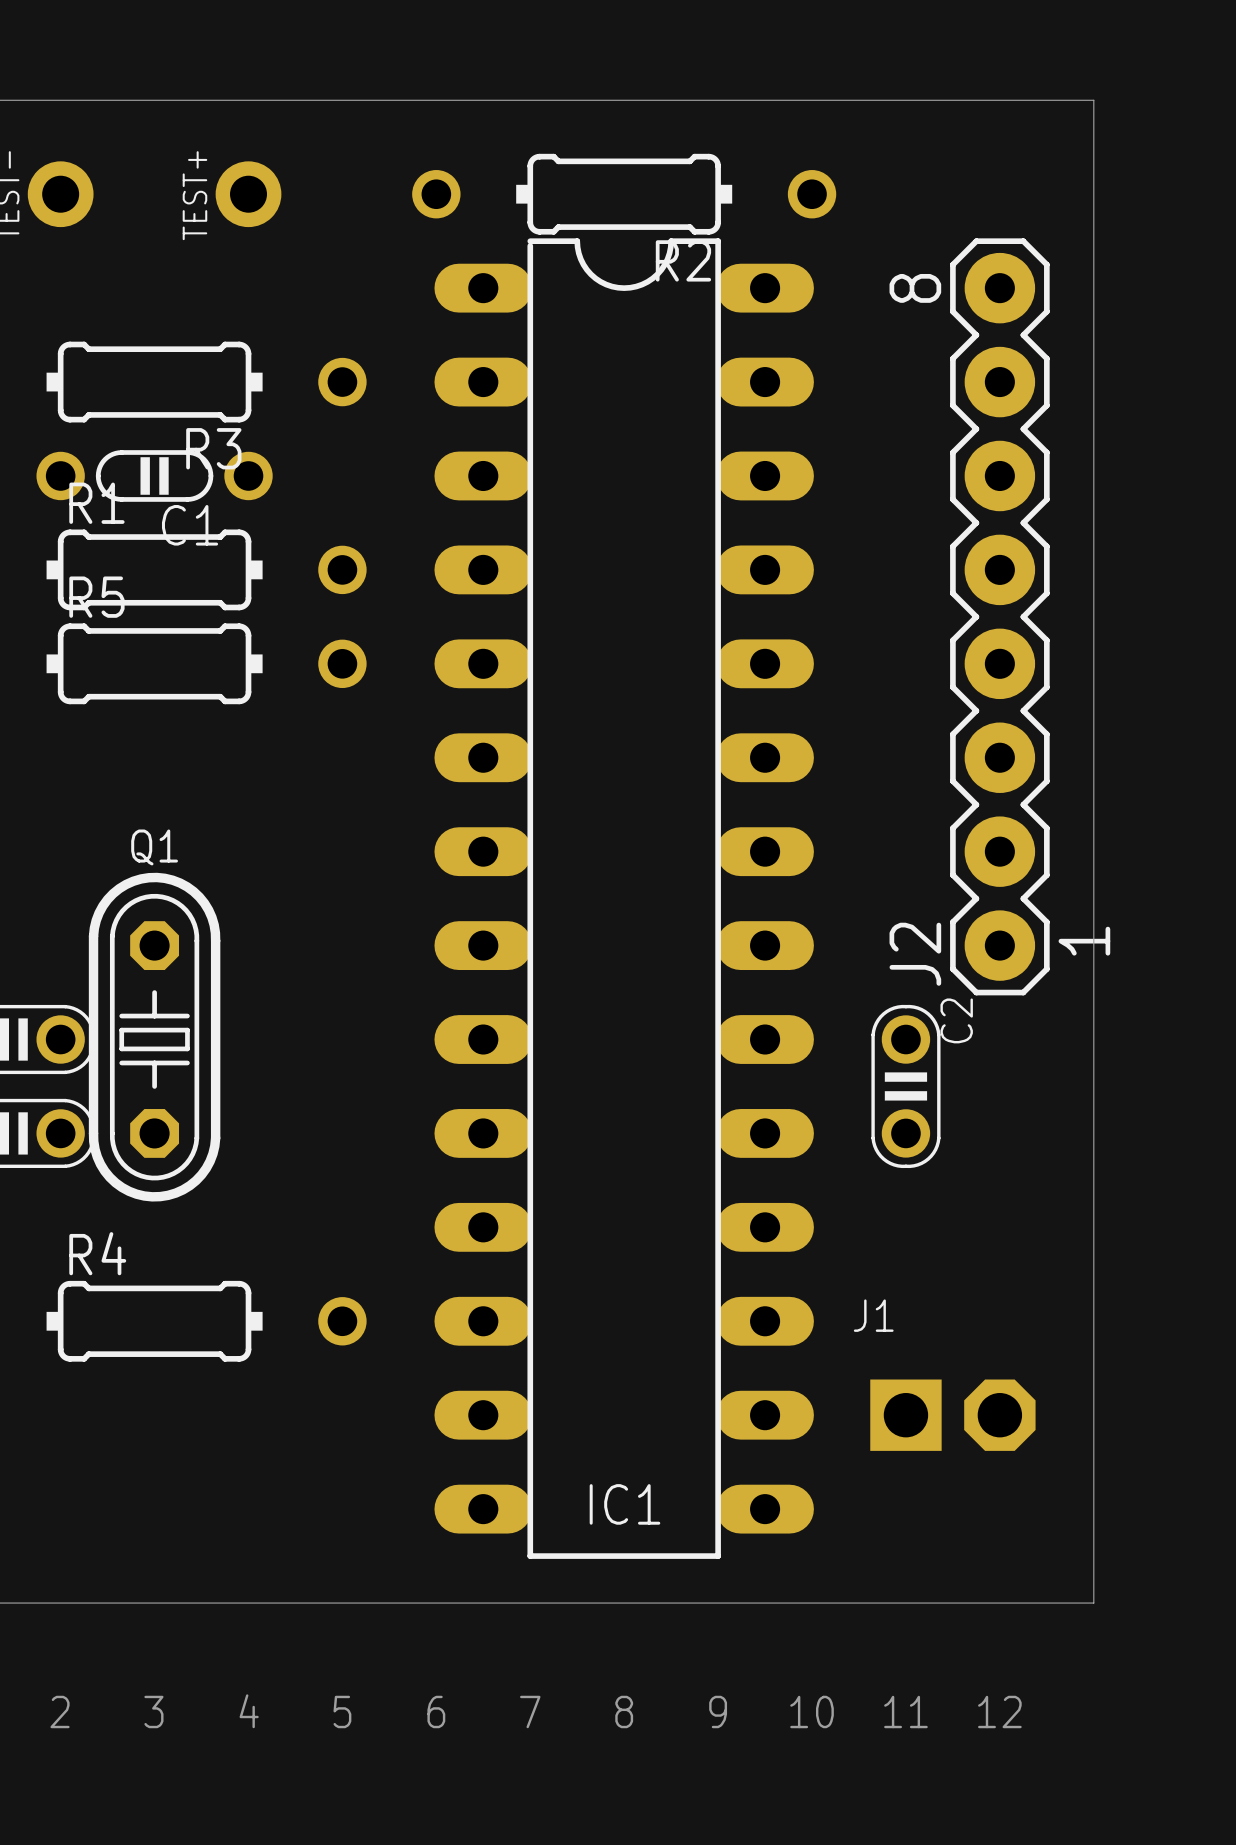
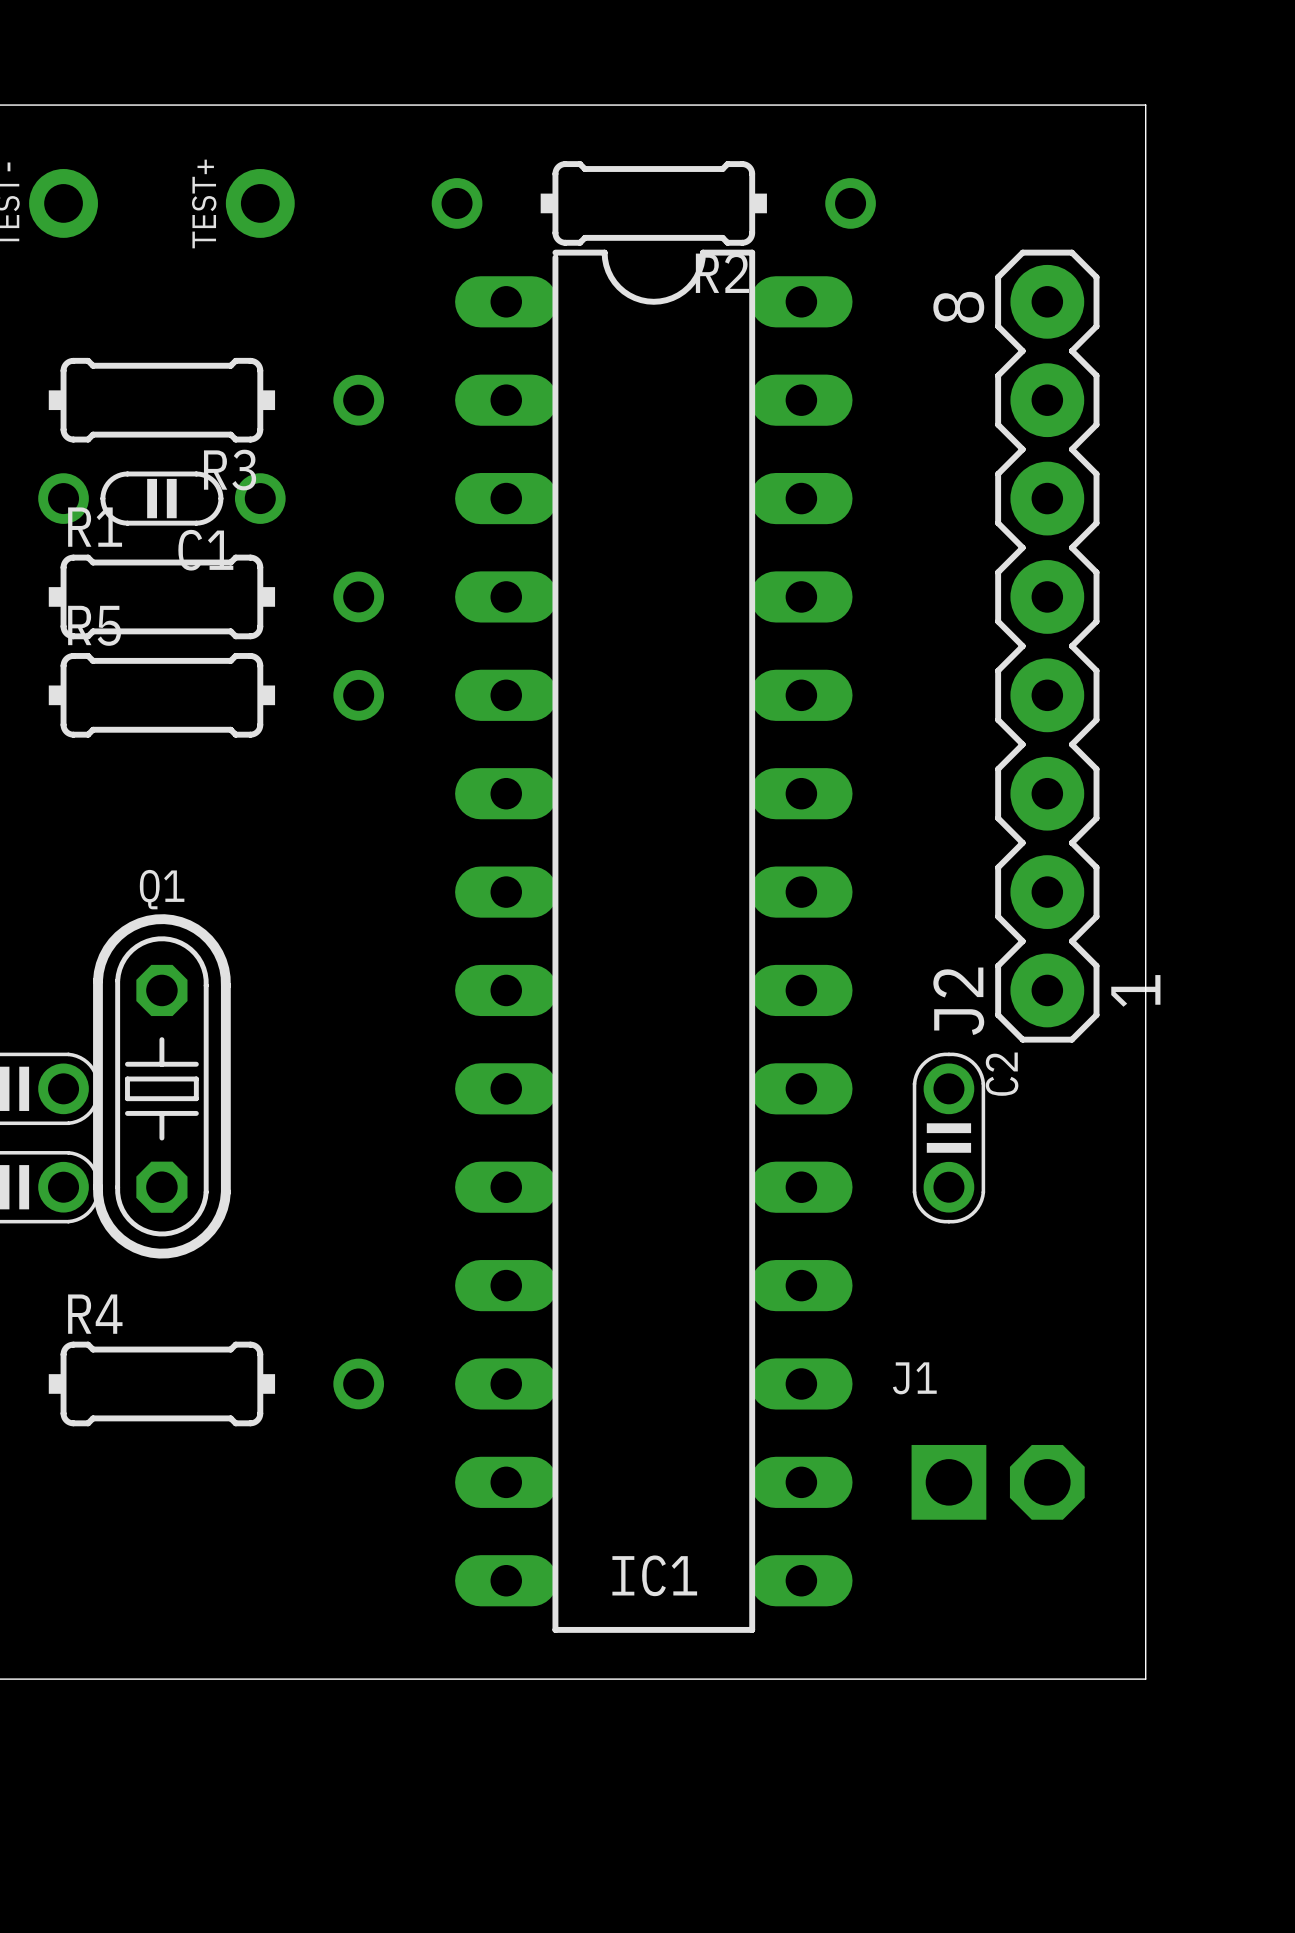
text: 2 (60, 1711) -> none
text: 3 (153, 1711) -> none
text: 4 (249, 1711) -> none
text: 5 (342, 1711) -> none
text: 6 (436, 1711) -> none
text: 7 (530, 1711) -> none
text: 8 (624, 1711) -> none
text: 9 (718, 1711) -> none
text: 10 (812, 1711) -> none
text: 11 (905, 1711) -> none
text: 12 (999, 1711) -> none

